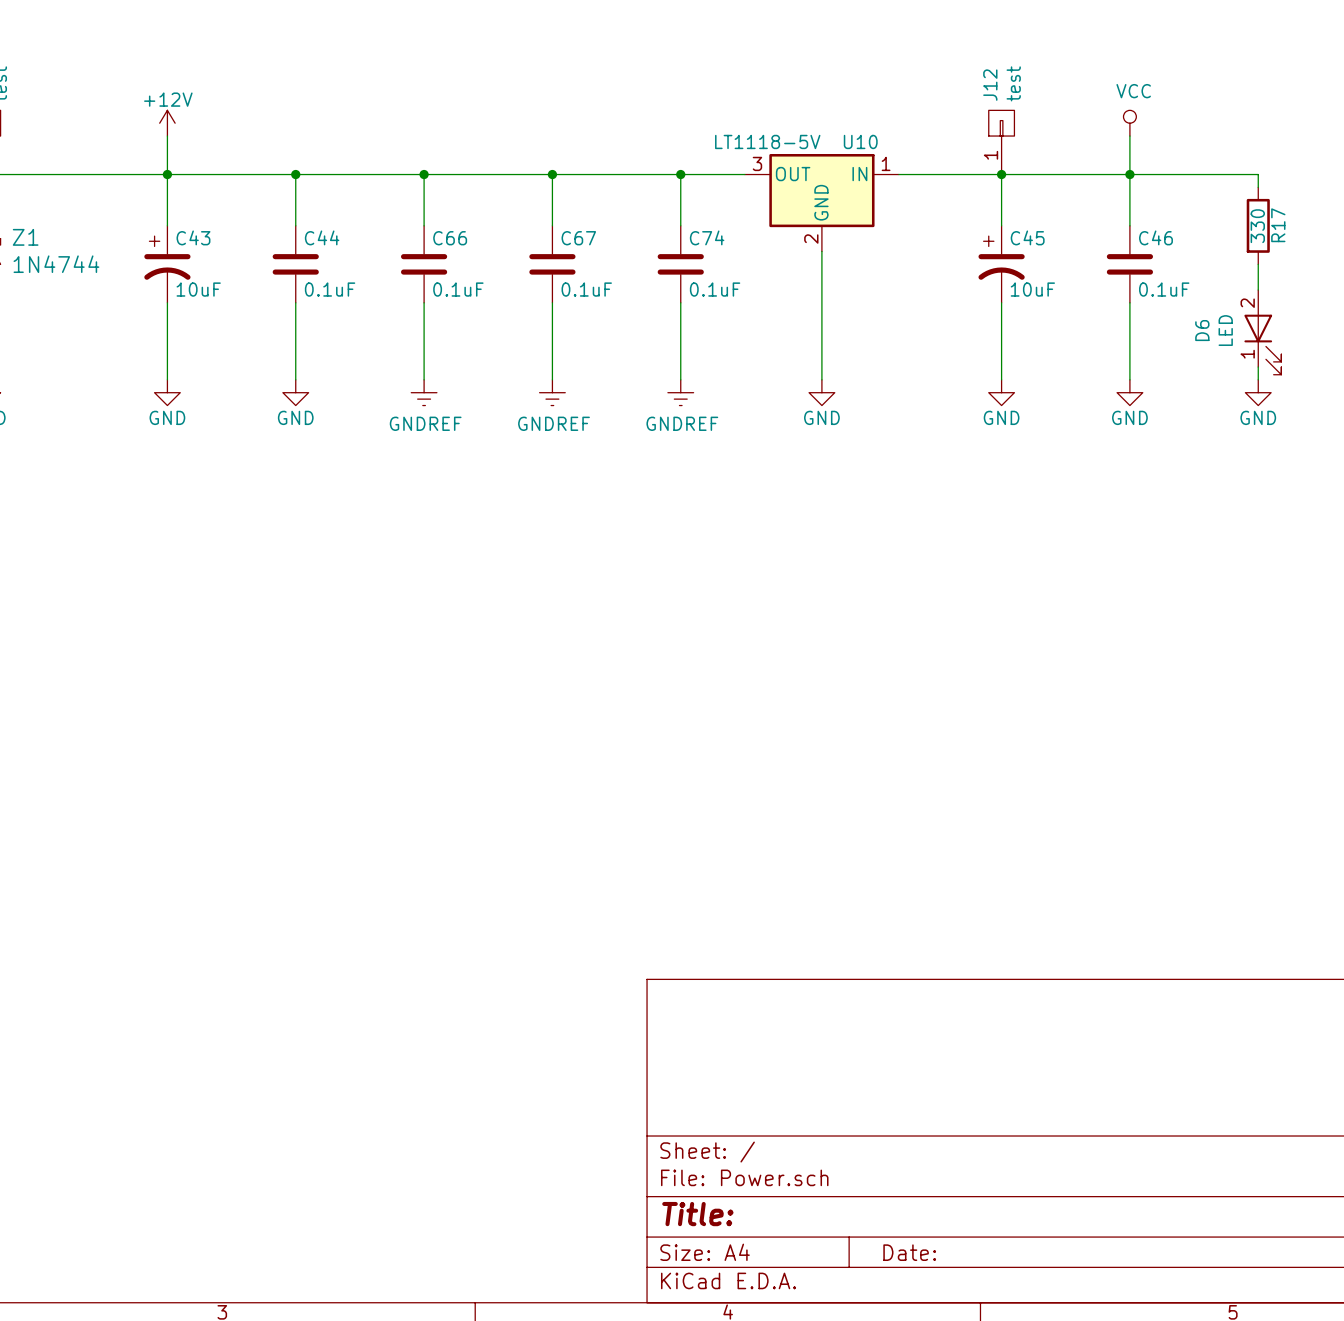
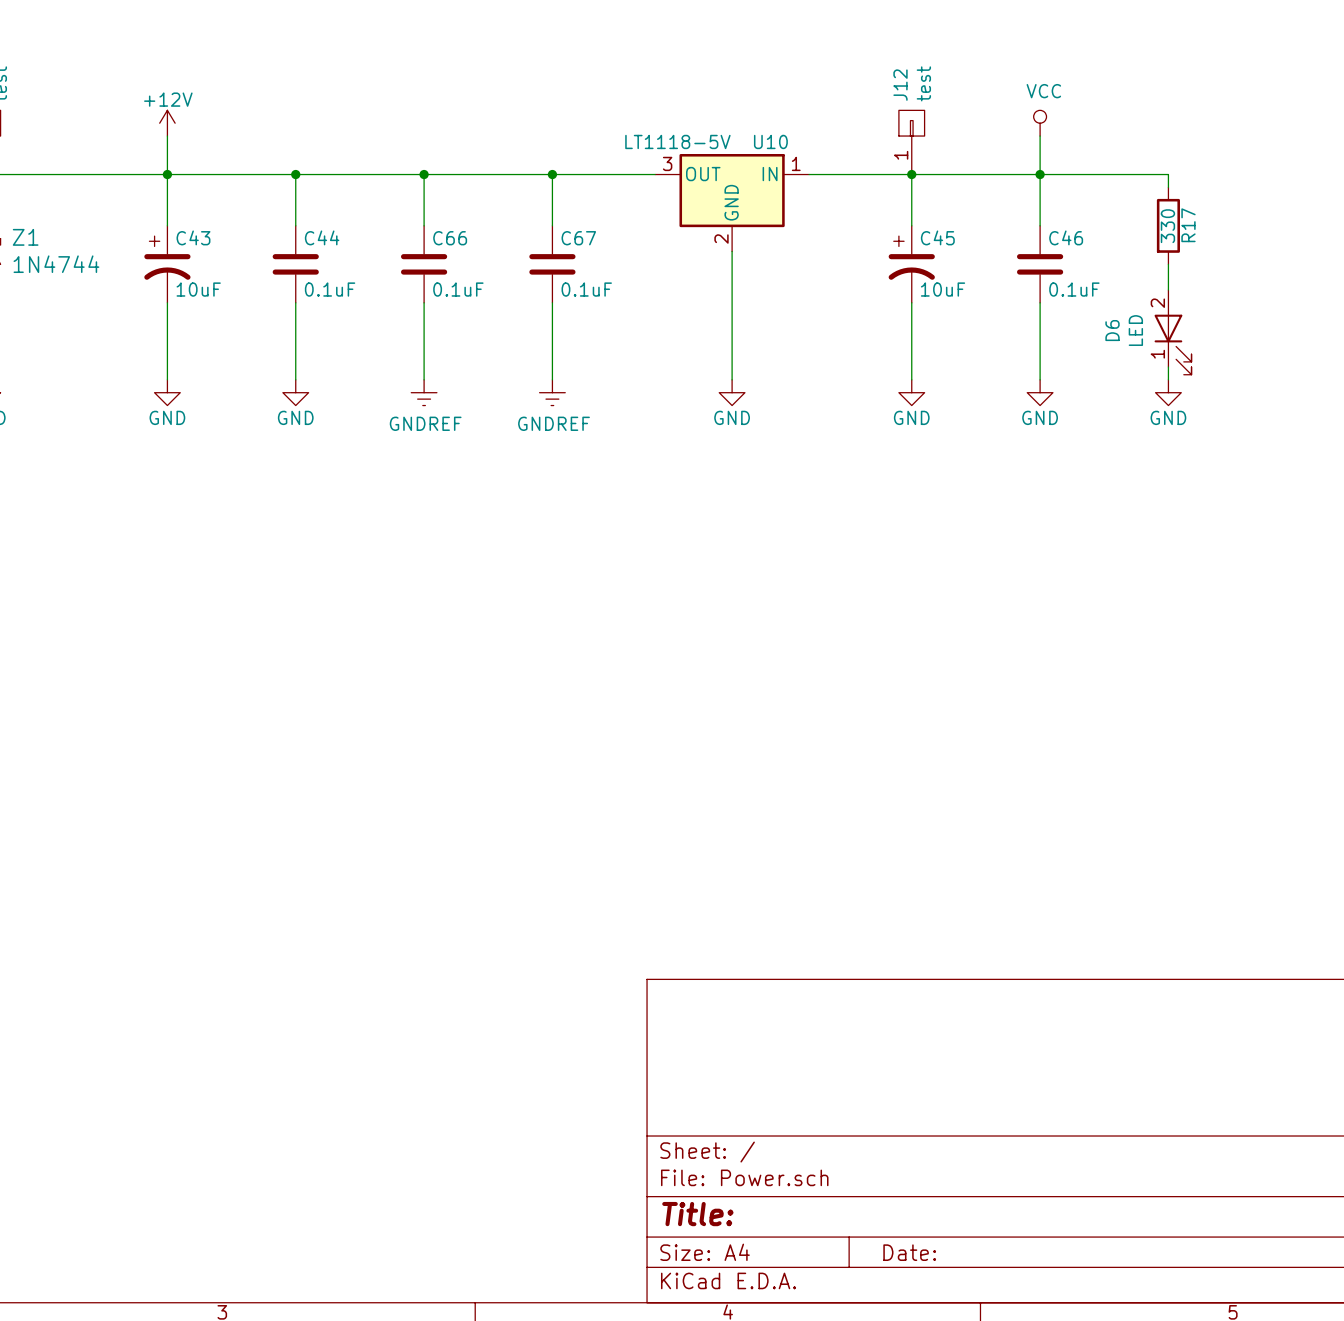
power symbol position: VCC (1129, 123) -> VCC (1040, 123)
wire: (1129, 136) (1129, 225) -> (1040, 136) (1040, 225)
J12 position: (1001, 142) -> (911, 142)
junction: (680, 174) -> none
junction: none -> (911, 174)
wire: (1001, 174) (1001, 225) -> (911, 174) (911, 225)
junction position: (1001, 174) -> (1040, 174)
junction: (1129, 174) -> none
wire: (1168, 174) (1258, 174) (1258, 187) -> (1168, 174) (1168, 187)
U10 position: (821, 202) -> (732, 202)
R17 position: (1258, 225) -> (1168, 225)
wire: (821, 251) (821, 379) -> (732, 251) (732, 379)
C74: 0.1uF (680, 264) -> none
C45 position: (1001, 264) -> (911, 264)
C46 position: (1129, 264) -> (1040, 264)
wire: (1258, 264) (1258, 290) -> (1168, 264) (1168, 290)
wire: (680, 302) (680, 379) -> none
wire: (1001, 302) (1001, 379) -> (911, 302) (911, 379)
wire: (1129, 302) (1129, 379) -> (1040, 302) (1040, 379)
D6 position: (1262, 332) -> (1173, 332)
wire: (1258, 367) (1258, 379) -> (1168, 367) (1168, 379)
power symbol: GNDREF (680, 392) -> none
power symbol: none -> GND (732, 392)
power symbol: GND (821, 392) -> none
power symbol: none -> GND (911, 392)
power symbol position: GND (1001, 392) -> GND (1040, 392)
power symbol position: GND (1129, 392) -> GND (1168, 392)
power symbol: GND (1258, 392) -> none

